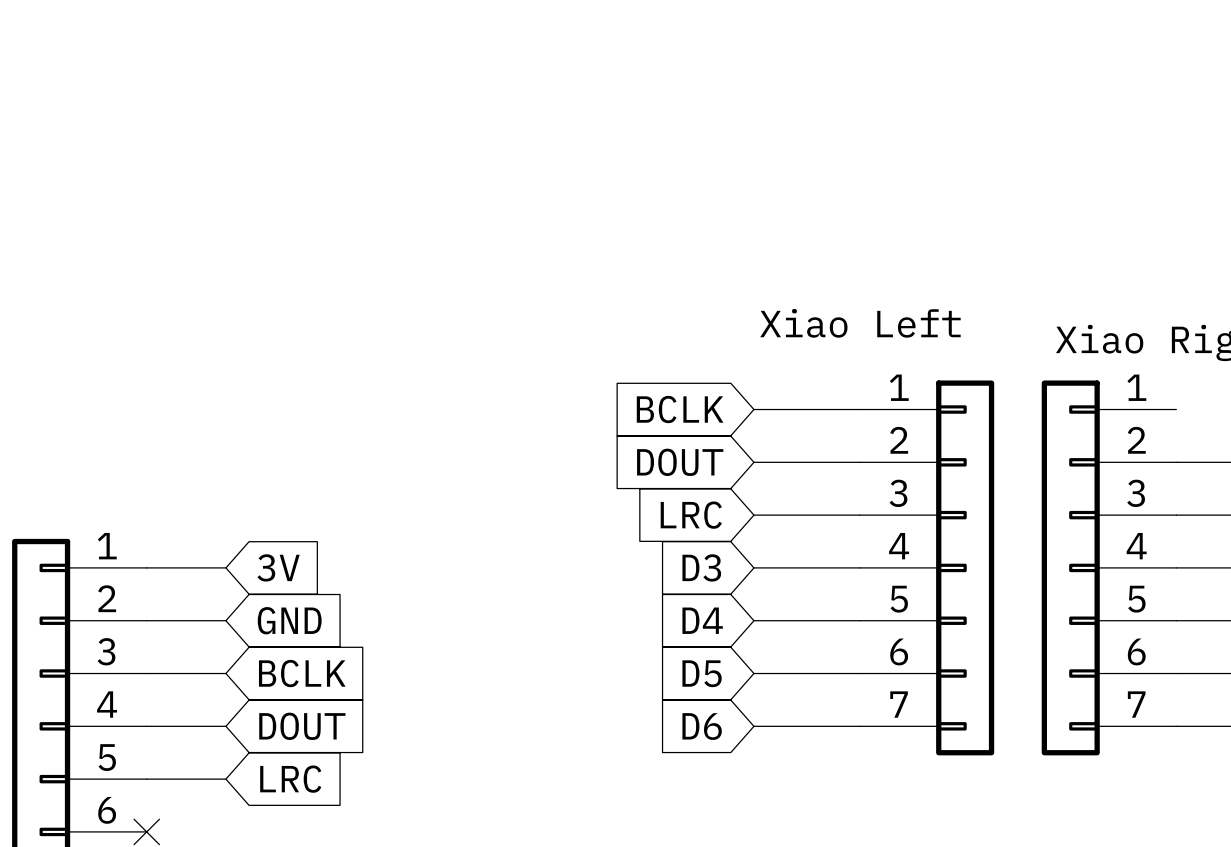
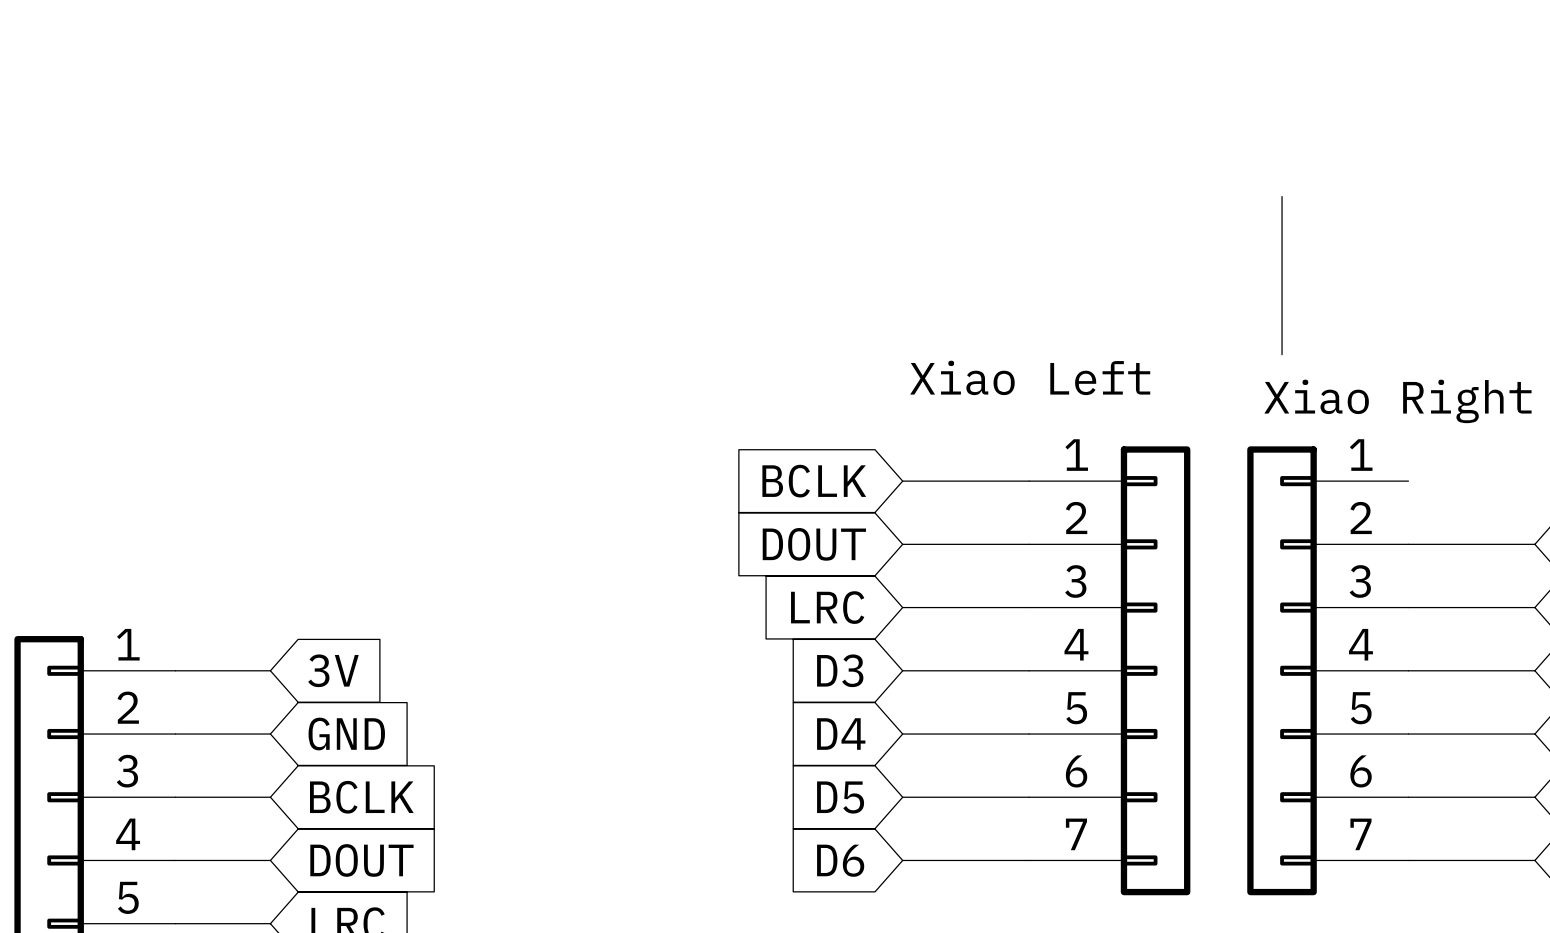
wire: none -> (1282, 196) (1282, 354)

